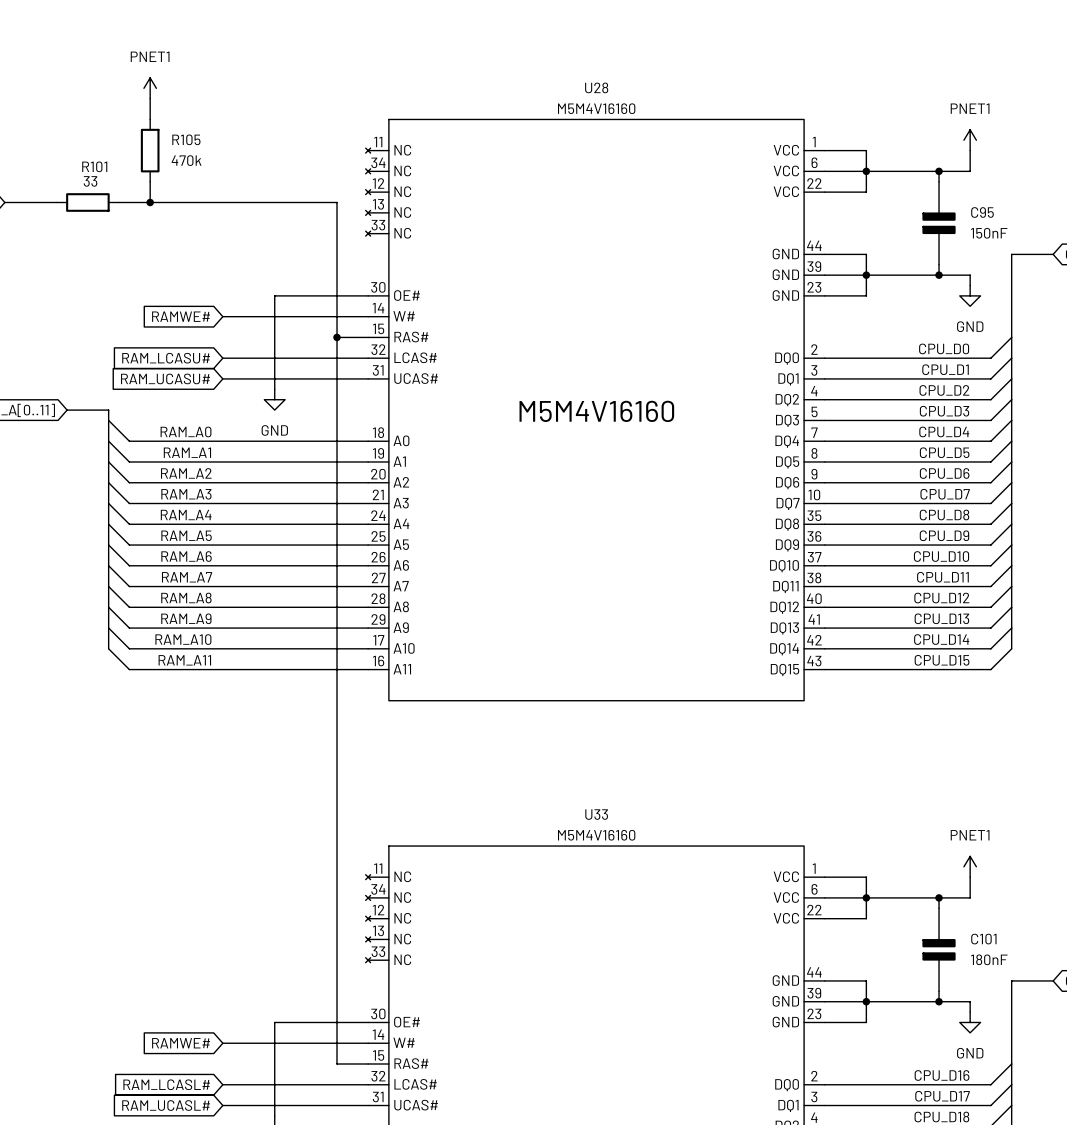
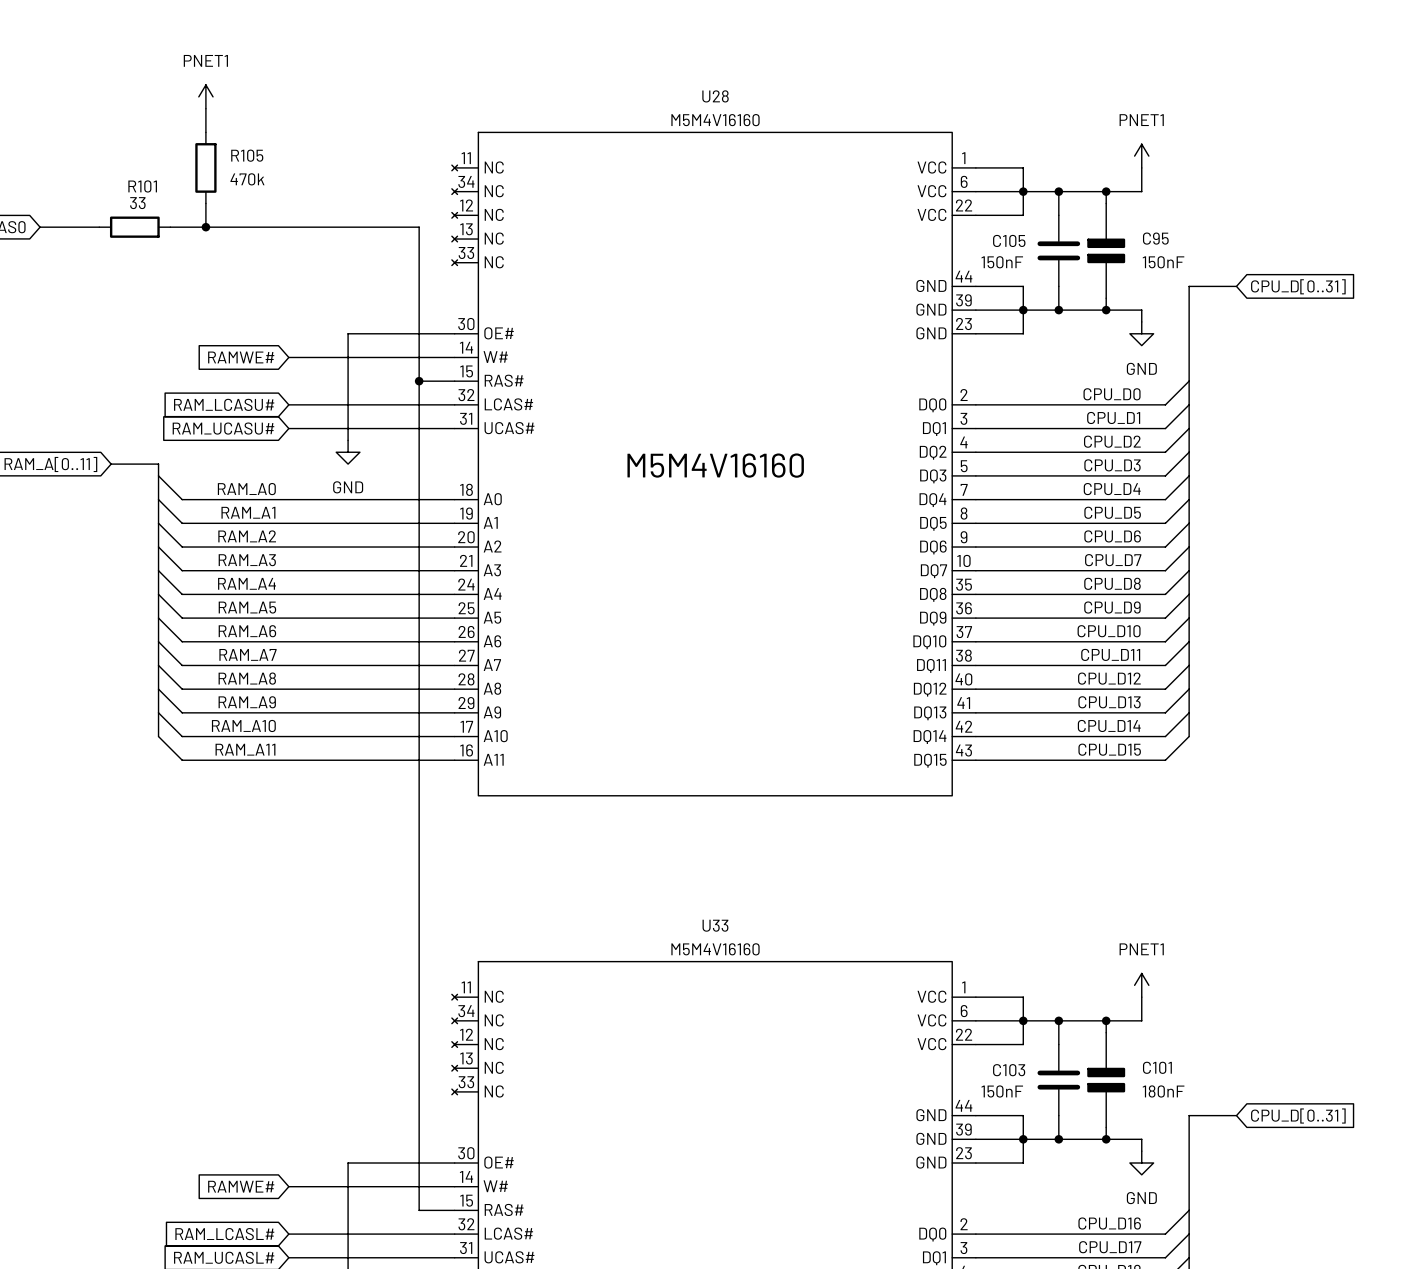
wire: none -> (1058, 191) (1058, 215)
junction: none -> (1058, 191)
C105: none -> 150nF (1058, 250)
wire: none -> (1058, 286) (1058, 310)
junction: none -> (1058, 310)
wire: none -> (1058, 1020) (1058, 1044)
junction: none -> (1058, 1020)
C103: none -> 150nF (1058, 1080)
wire: none -> (1058, 1115) (1058, 1139)
junction: none -> (1058, 1139)

